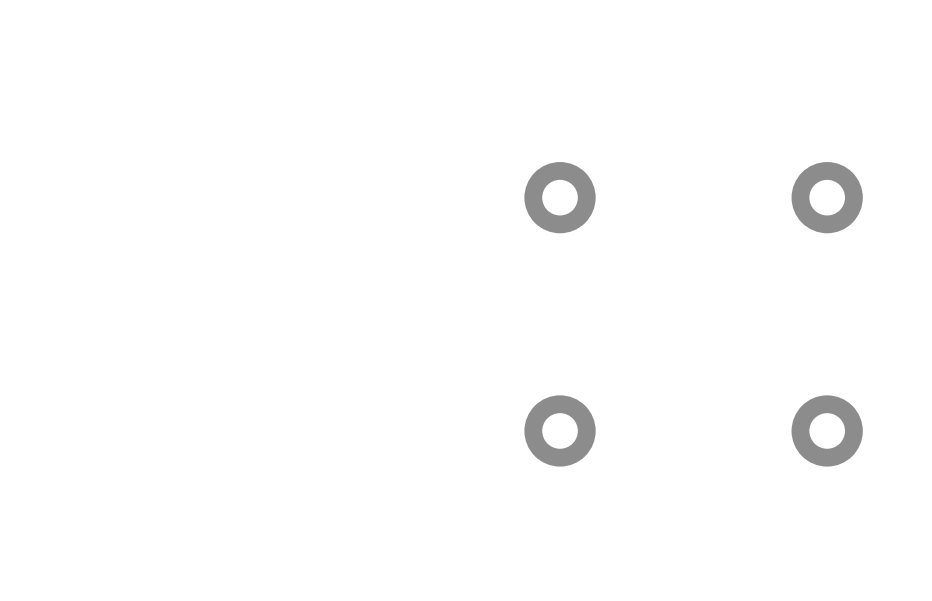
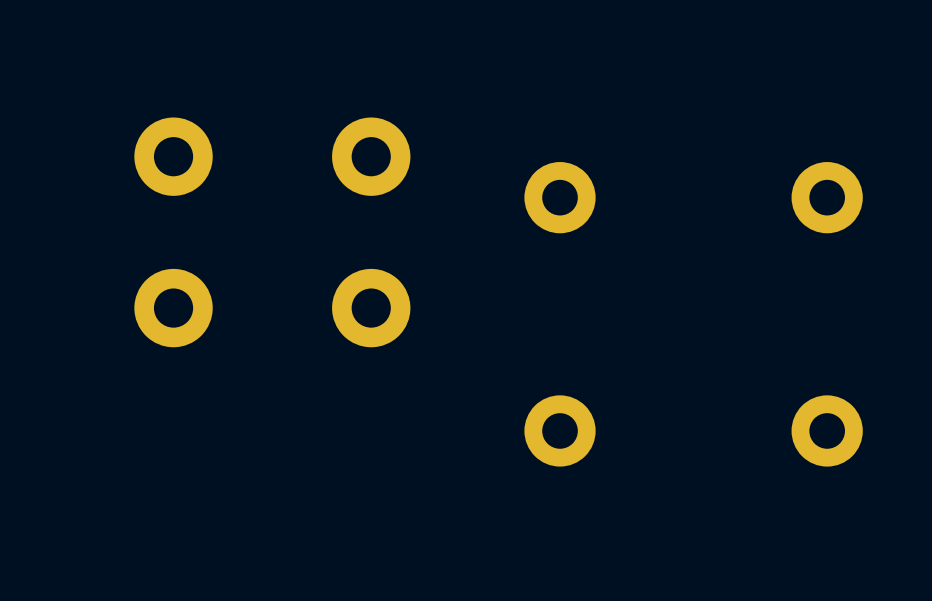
part: none -> (173, 156)
part: none -> (371, 156)
part: none -> (173, 308)
part: none -> (371, 308)

